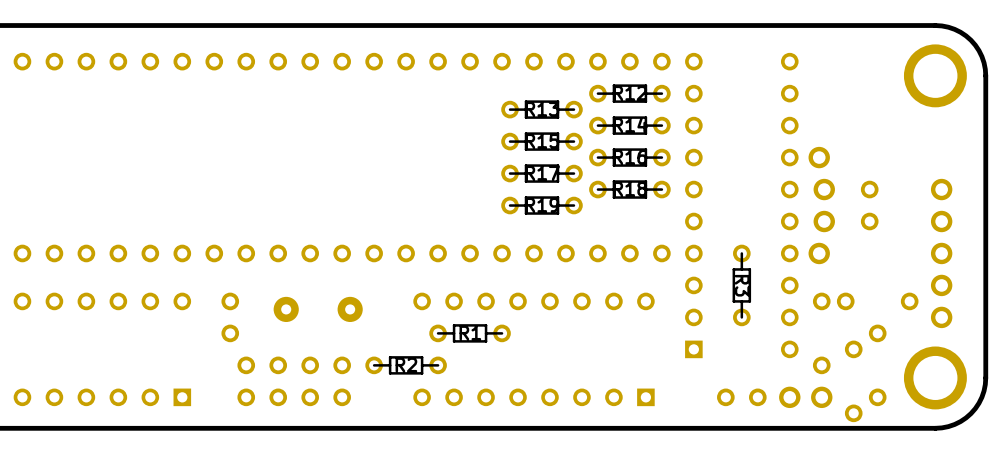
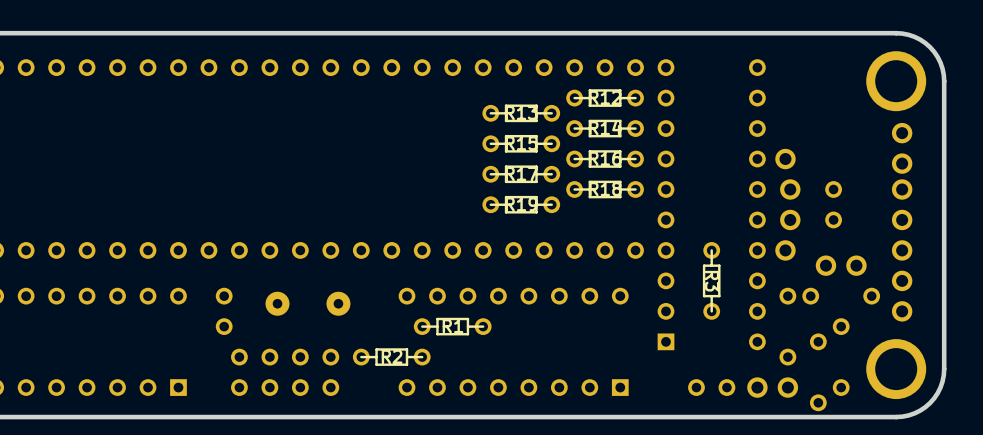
part: none -> (902, 148)
part: none -> (841, 265)

